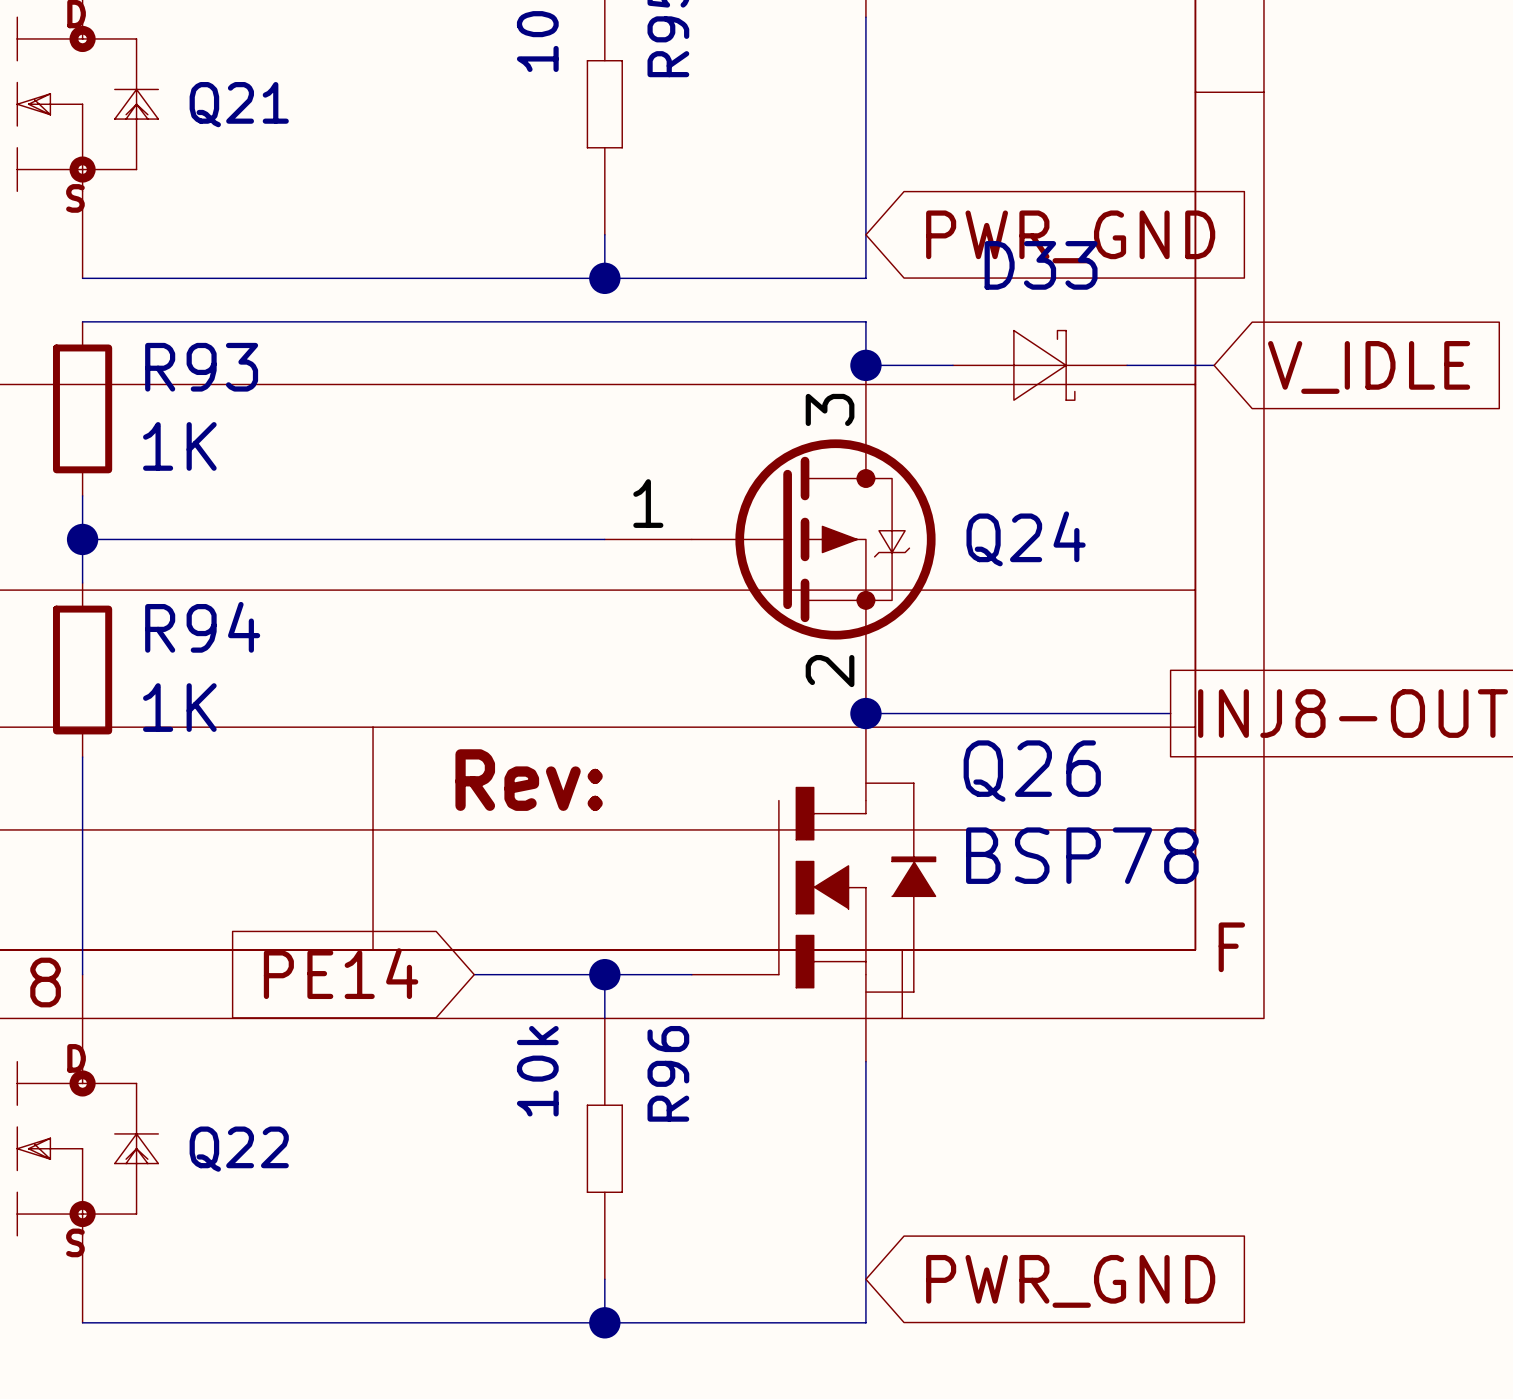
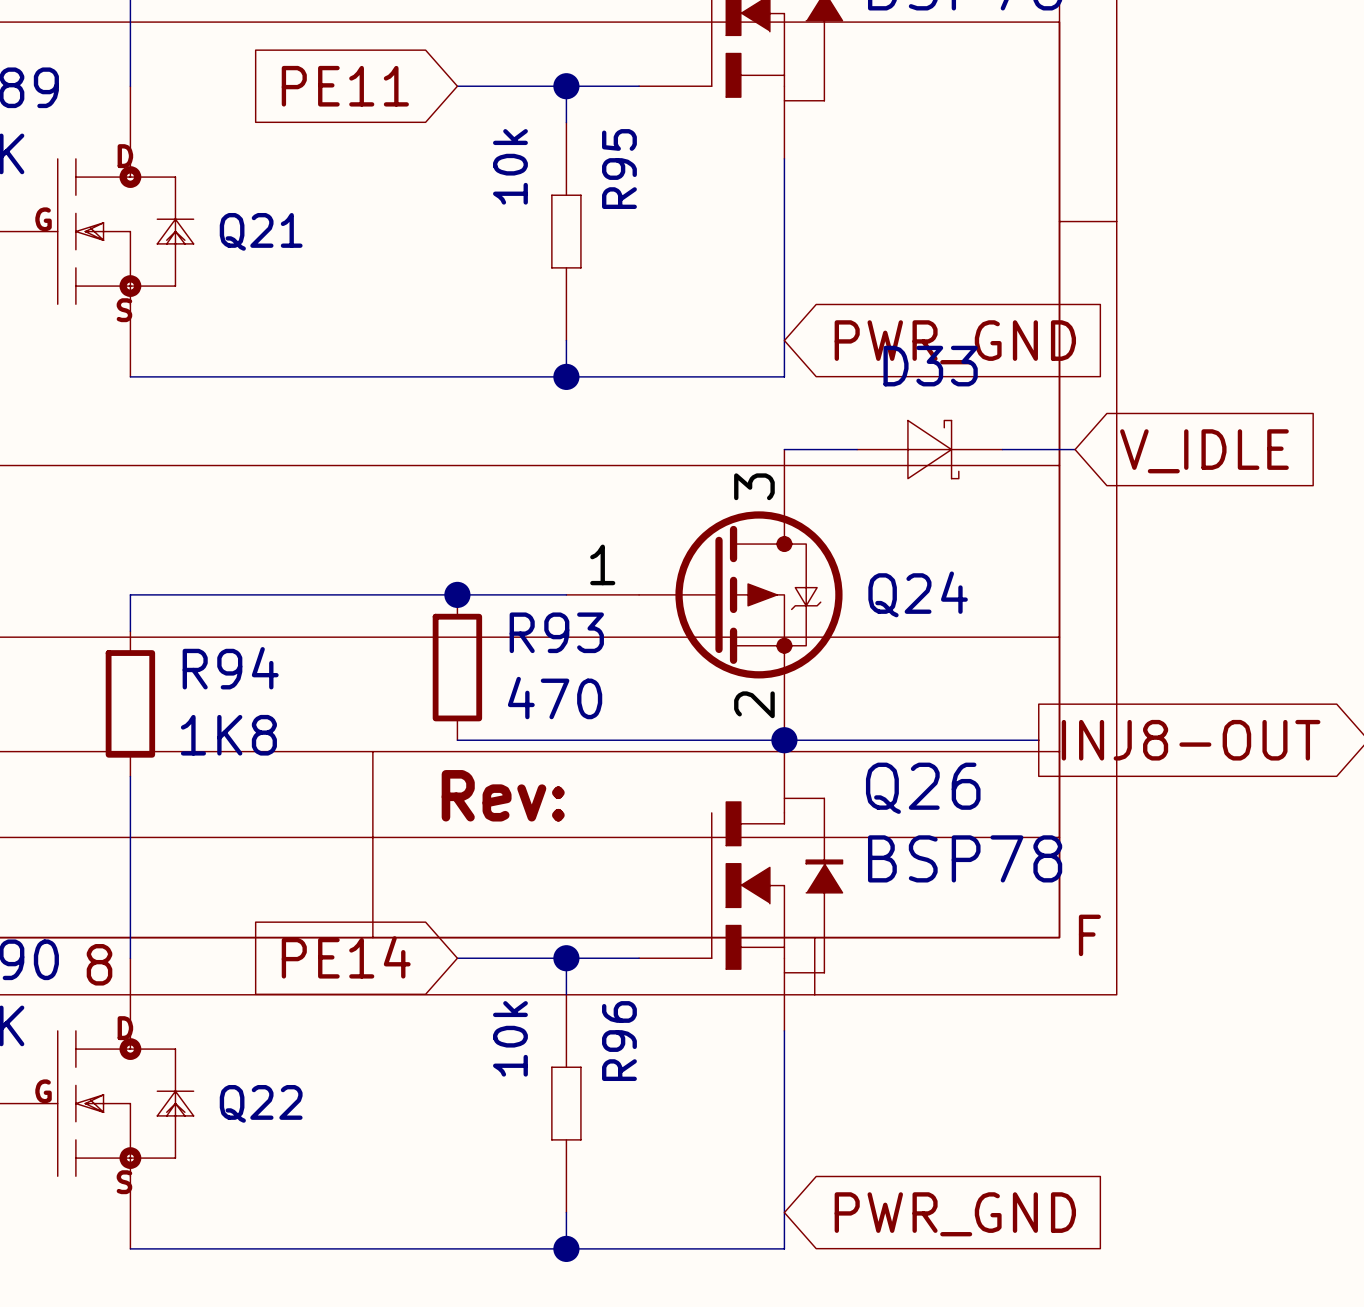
wire: (82, 321) (865, 321) (865, 365) -> none
junction: (865, 365) -> none
R93 position: (82, 408) -> (457, 667)
R93 value: 1K (179, 446) -> 470 (555, 698)
wire: (82, 495) (82, 539) -> none
junction: (82, 539) -> none
junction: none -> (457, 594)
R94 value: 1K (179, 707) -> 1K8 (228, 735)
wire: none -> (457, 740) (784, 740)

